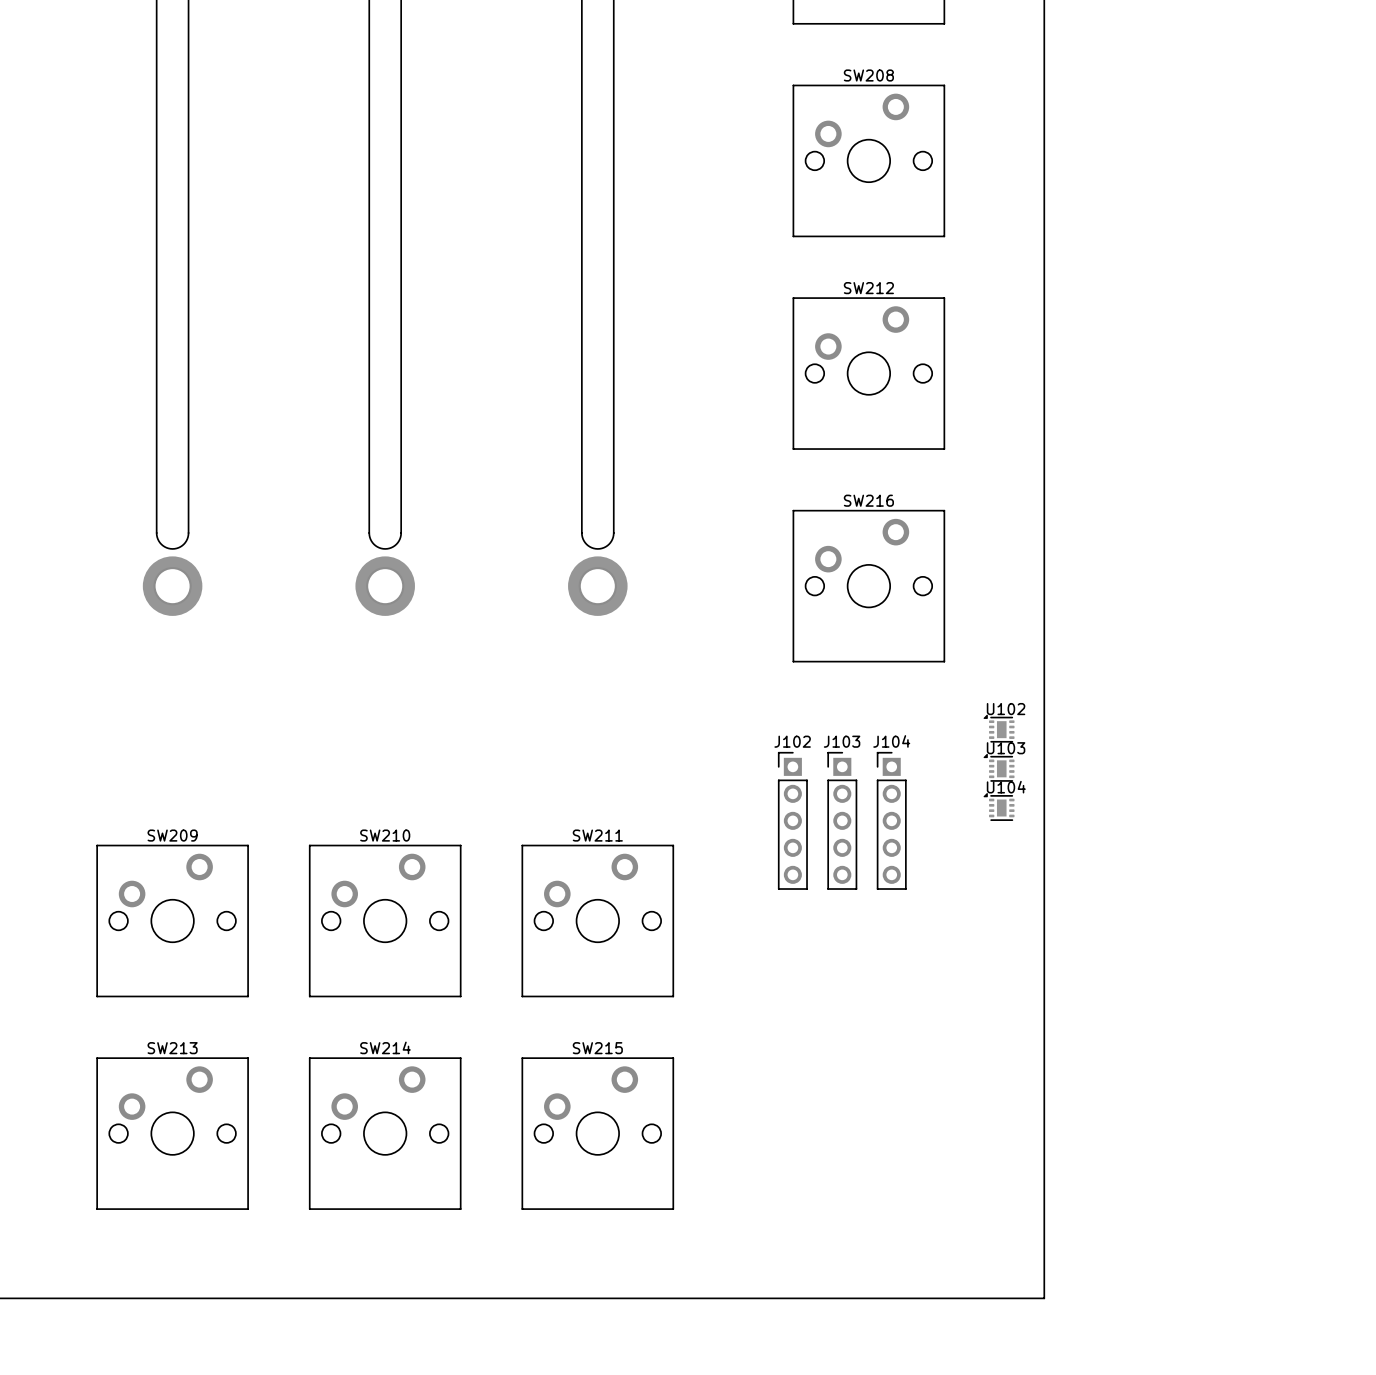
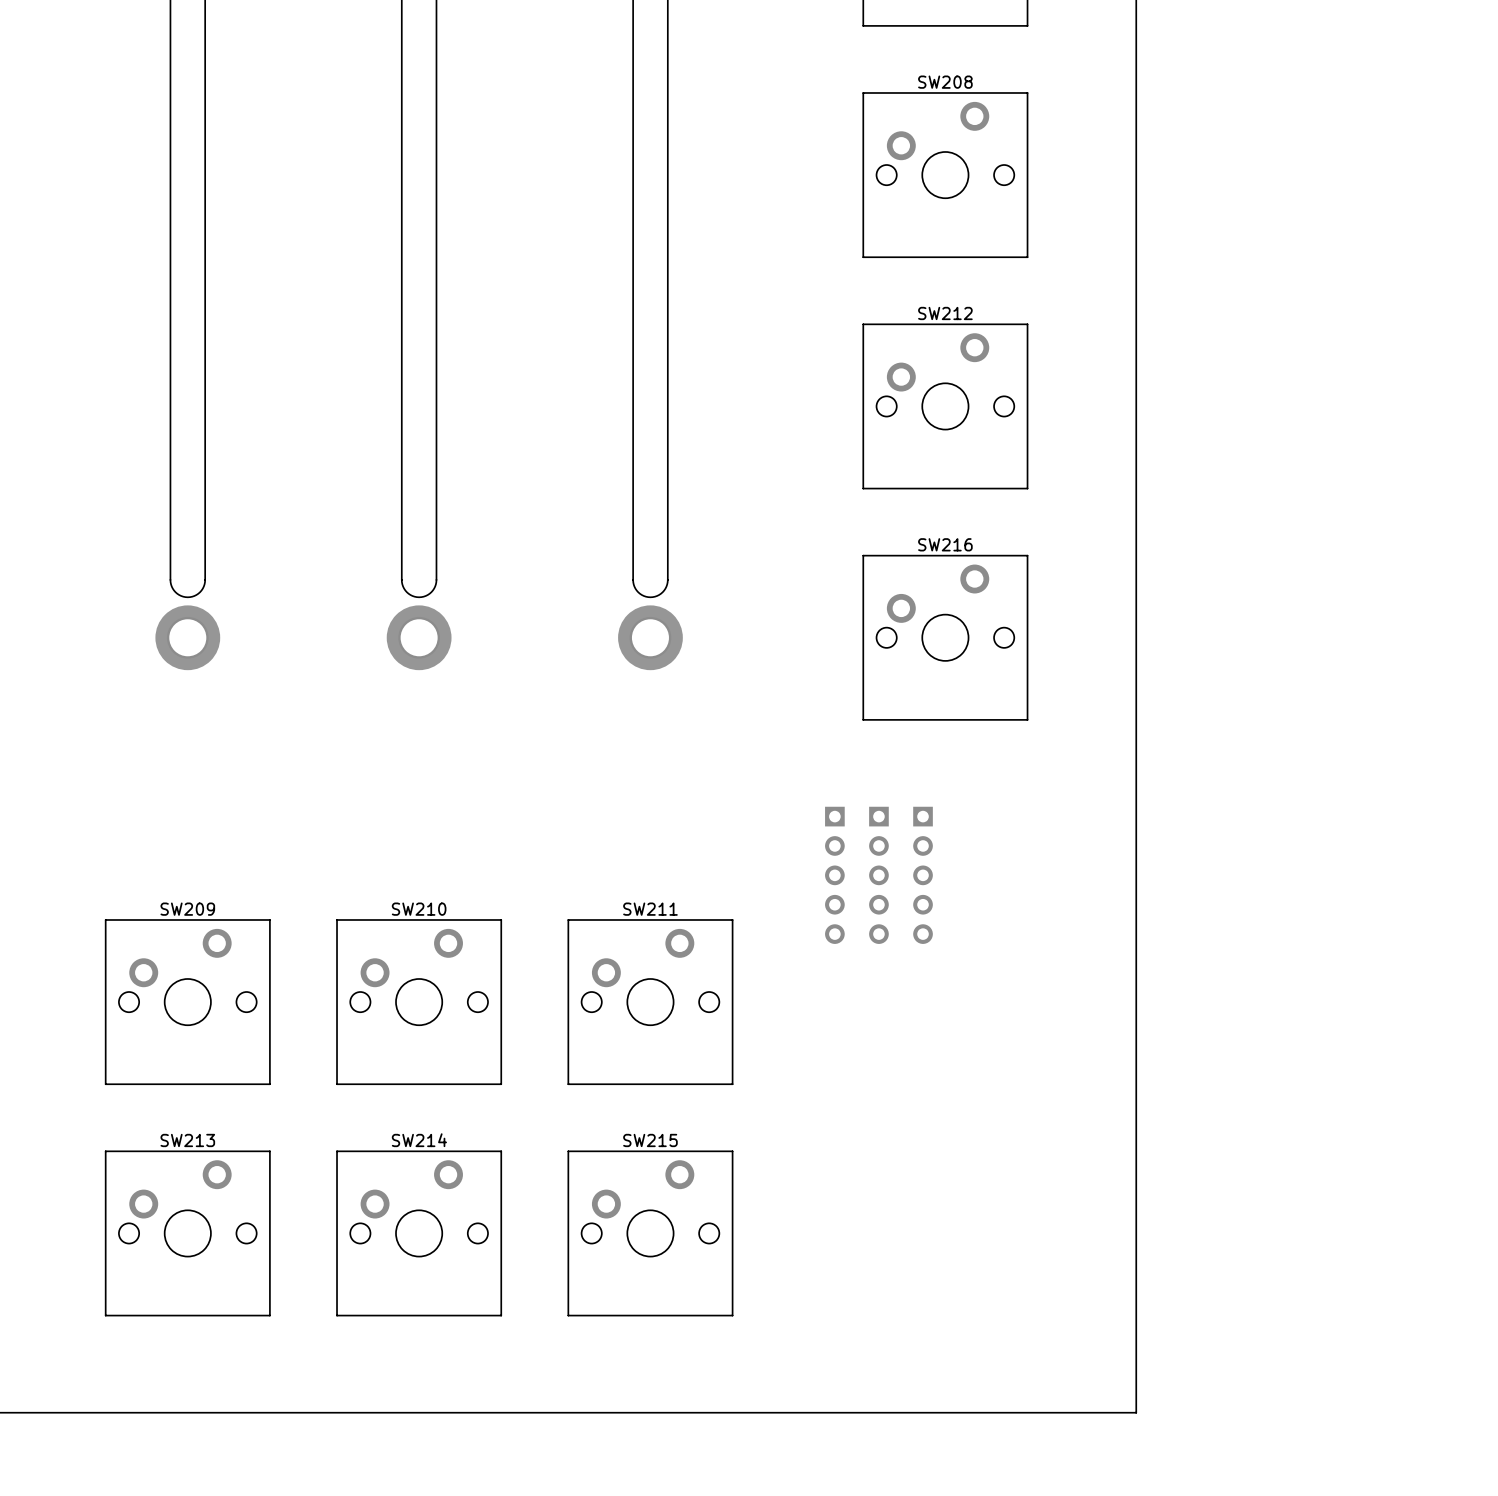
U102: (999, 728) -> none
U103: (999, 767) -> none
U104: (999, 806) -> none
J102 side: top (792, 820) -> bottom (834, 875)
J103 side: top (842, 820) -> bottom (878, 875)
J104 side: top (891, 820) -> bottom (923, 875)

